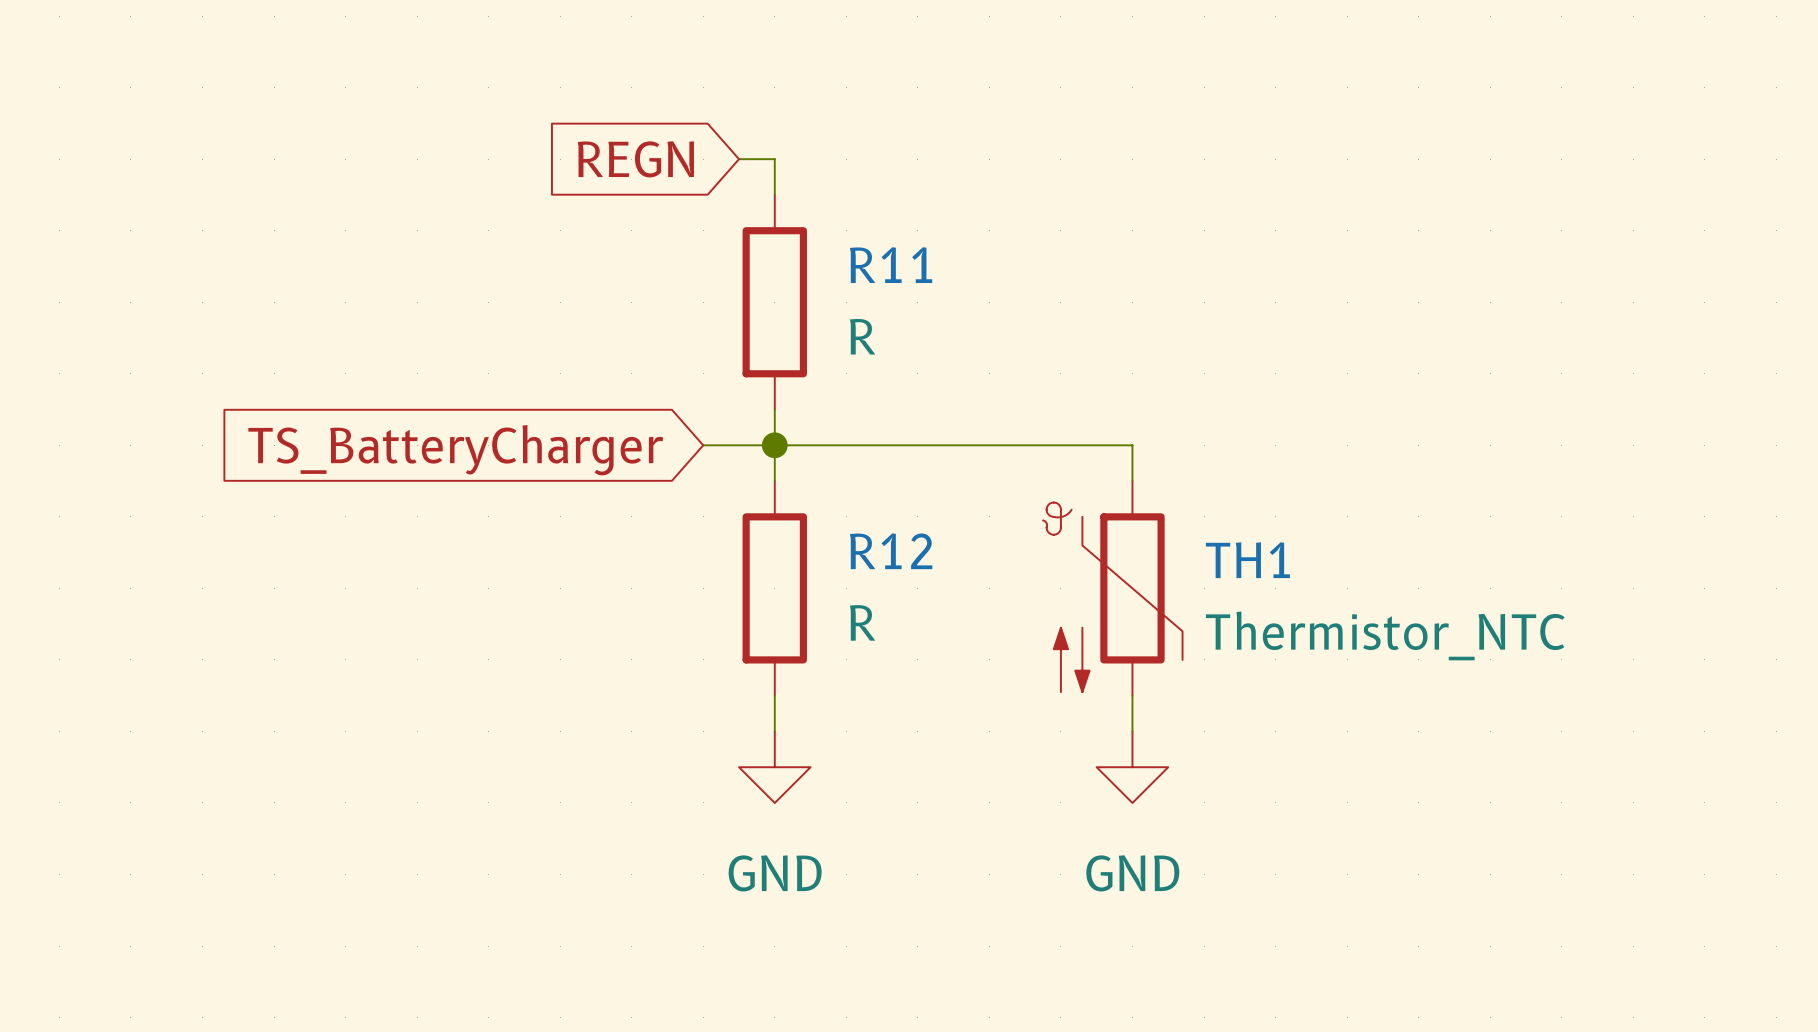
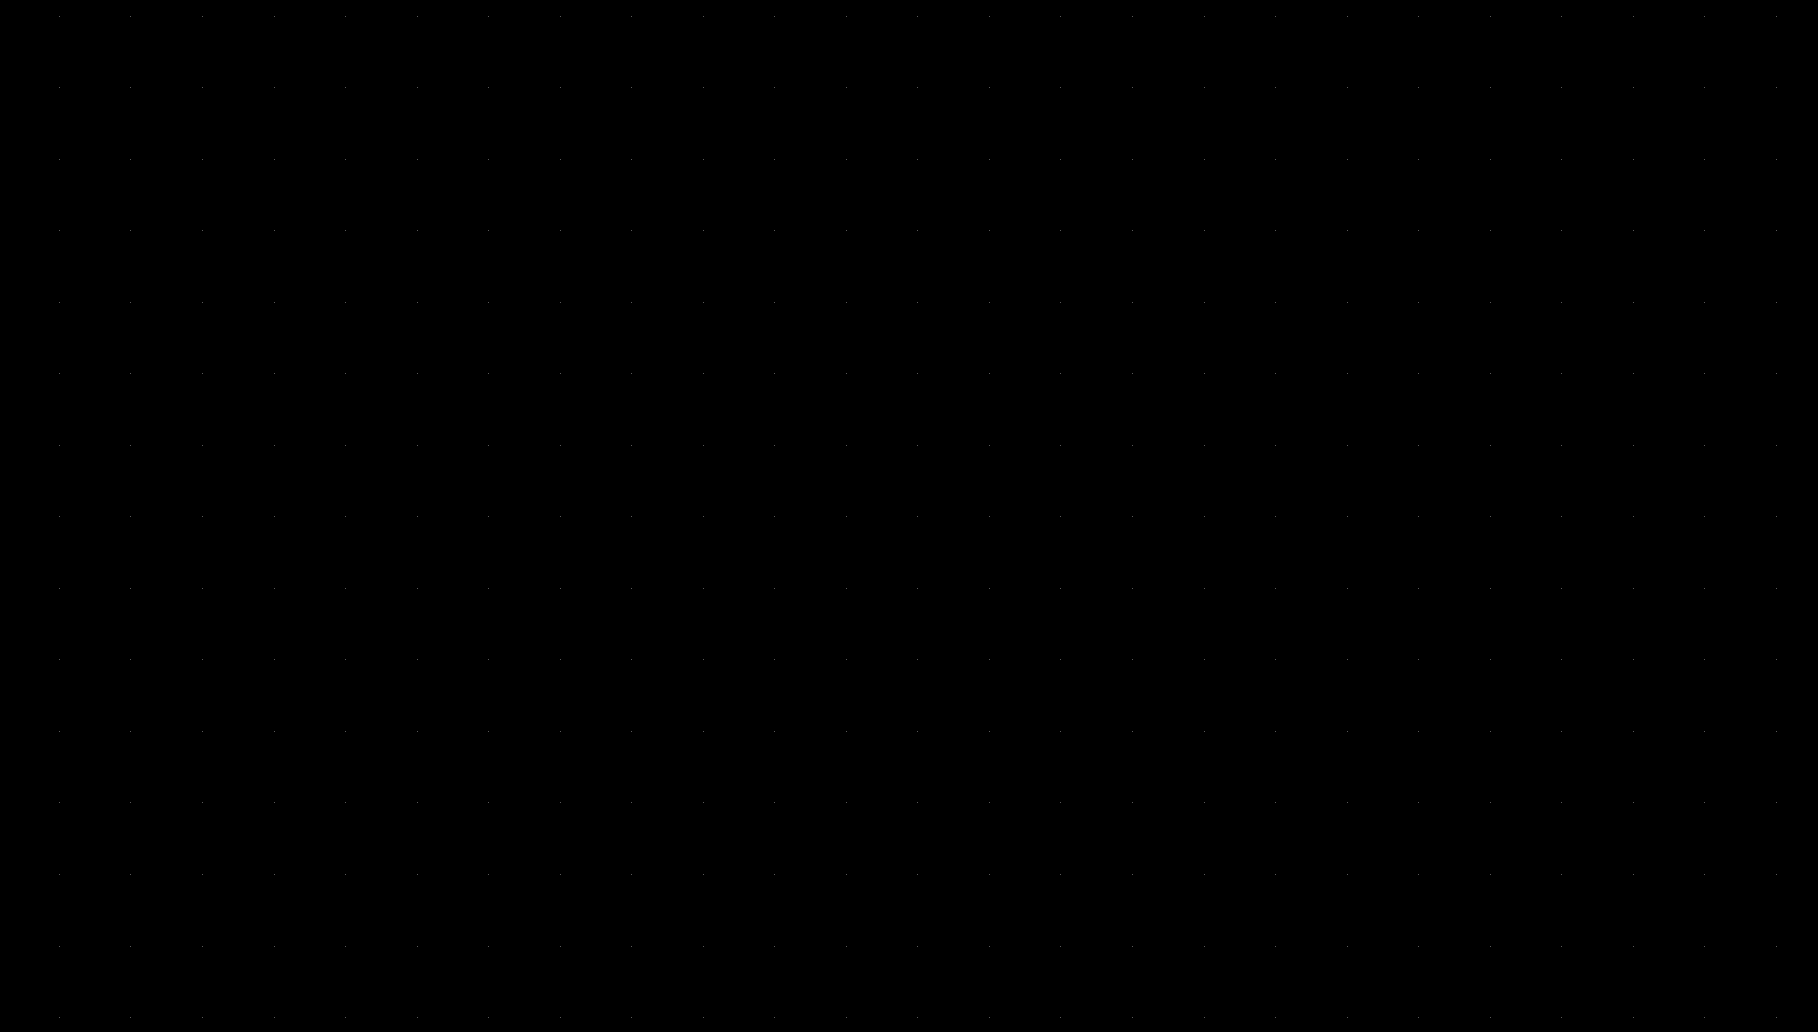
global label: REGN (635, 159) -> none
wire: (739, 159) (774, 159) (774, 194) -> none
R11: R (774, 302) -> none
wire: (774, 409) (774, 481) -> none
wire: (703, 445) (1132, 445) (1132, 481) -> none
junction: (774, 445) -> none
global label: TS_BatteryCharger (455, 450) -> none
R12: R (774, 588) -> none
TH1: Thermistor_NTC (1112, 588) -> none
wire: (774, 695) (774, 731) -> none
wire: (1132, 695) (1132, 731) -> none
power symbol: GND (774, 767) -> none
power symbol: GND (1132, 767) -> none

